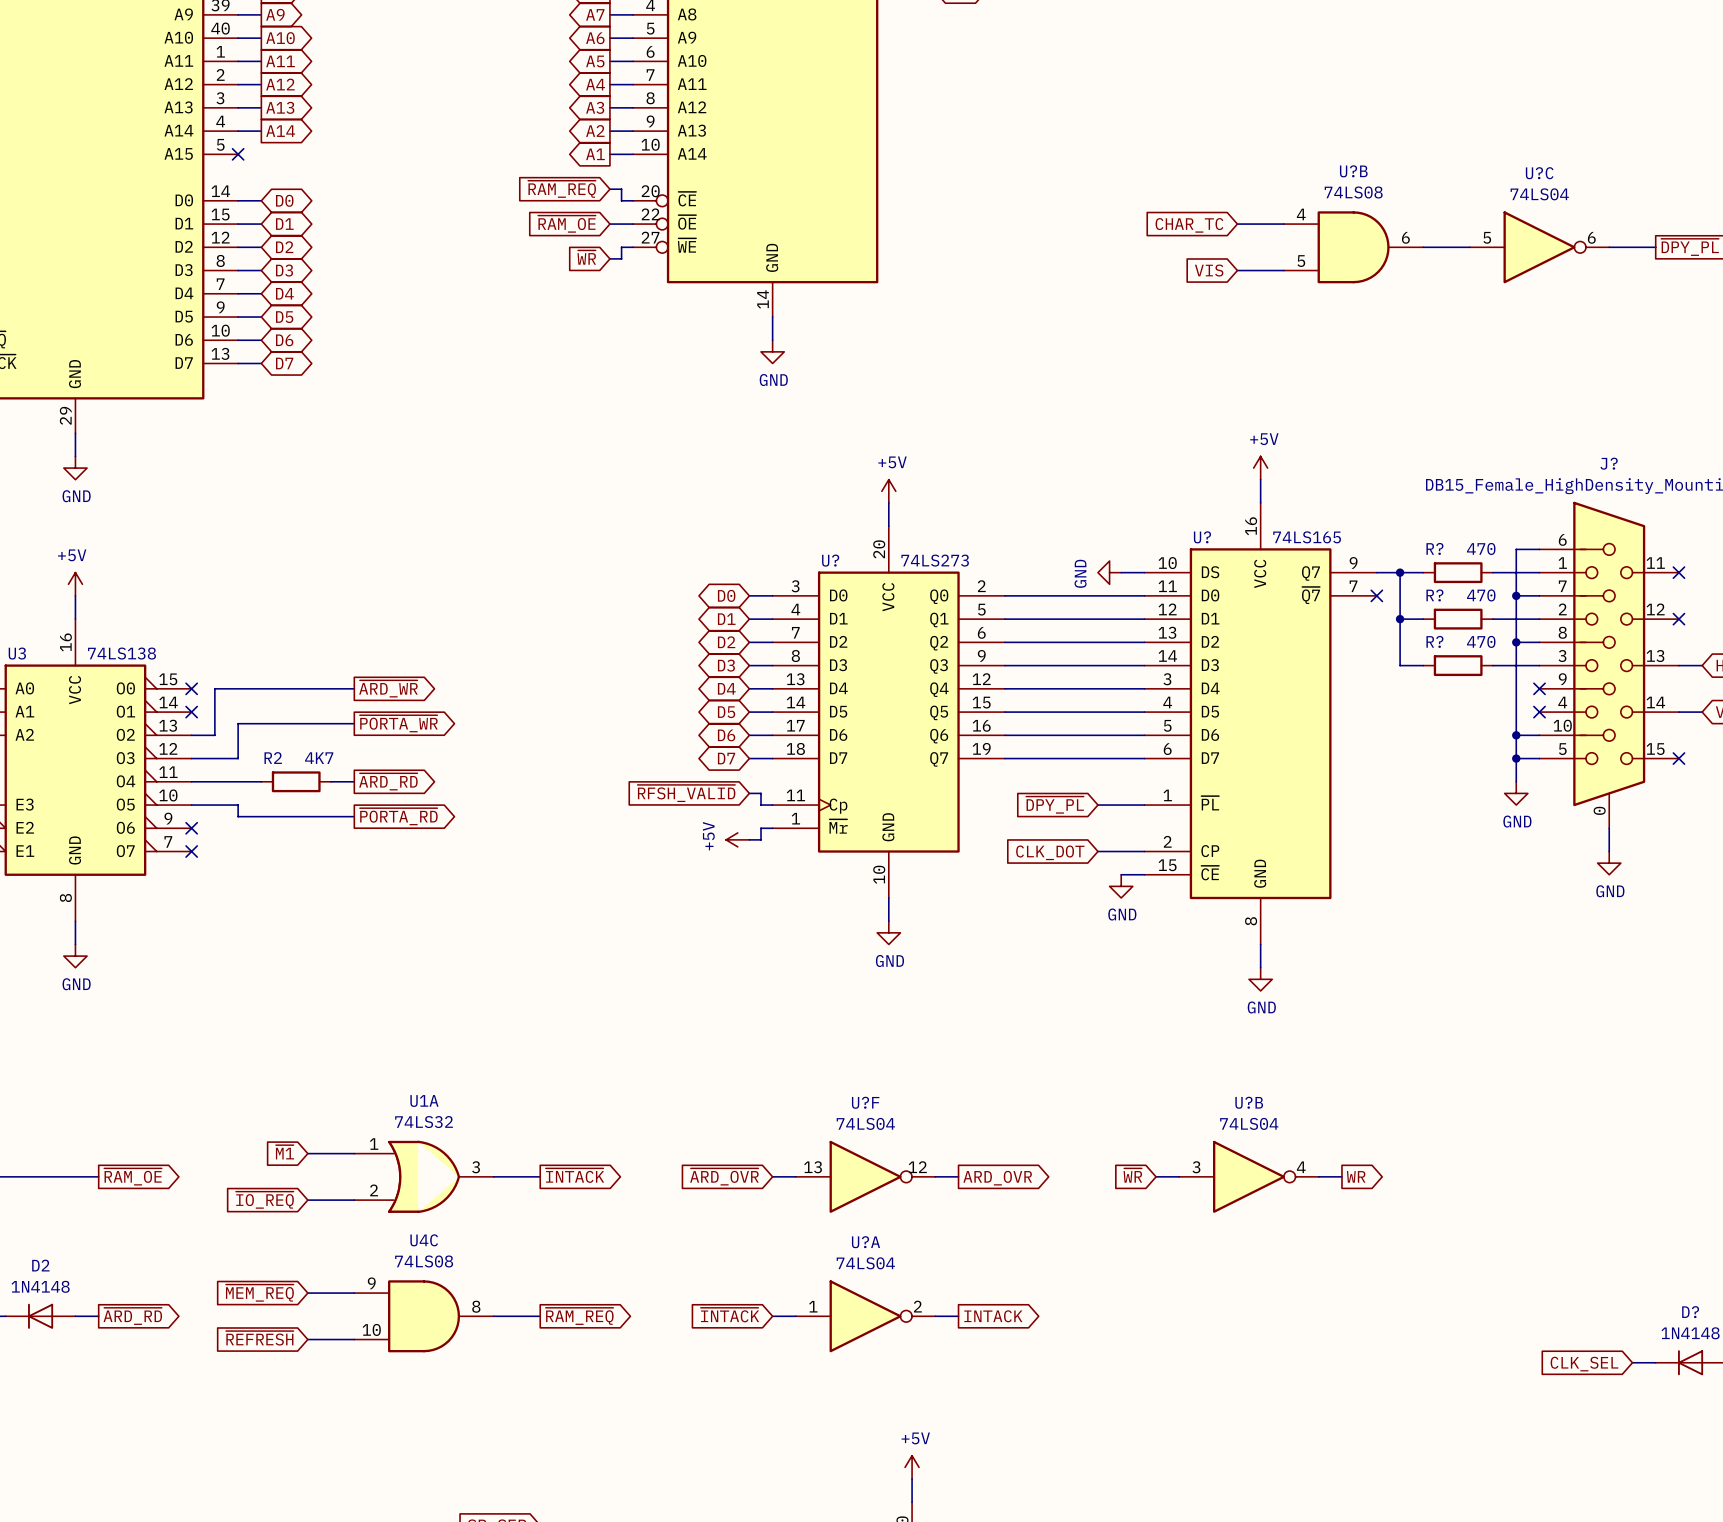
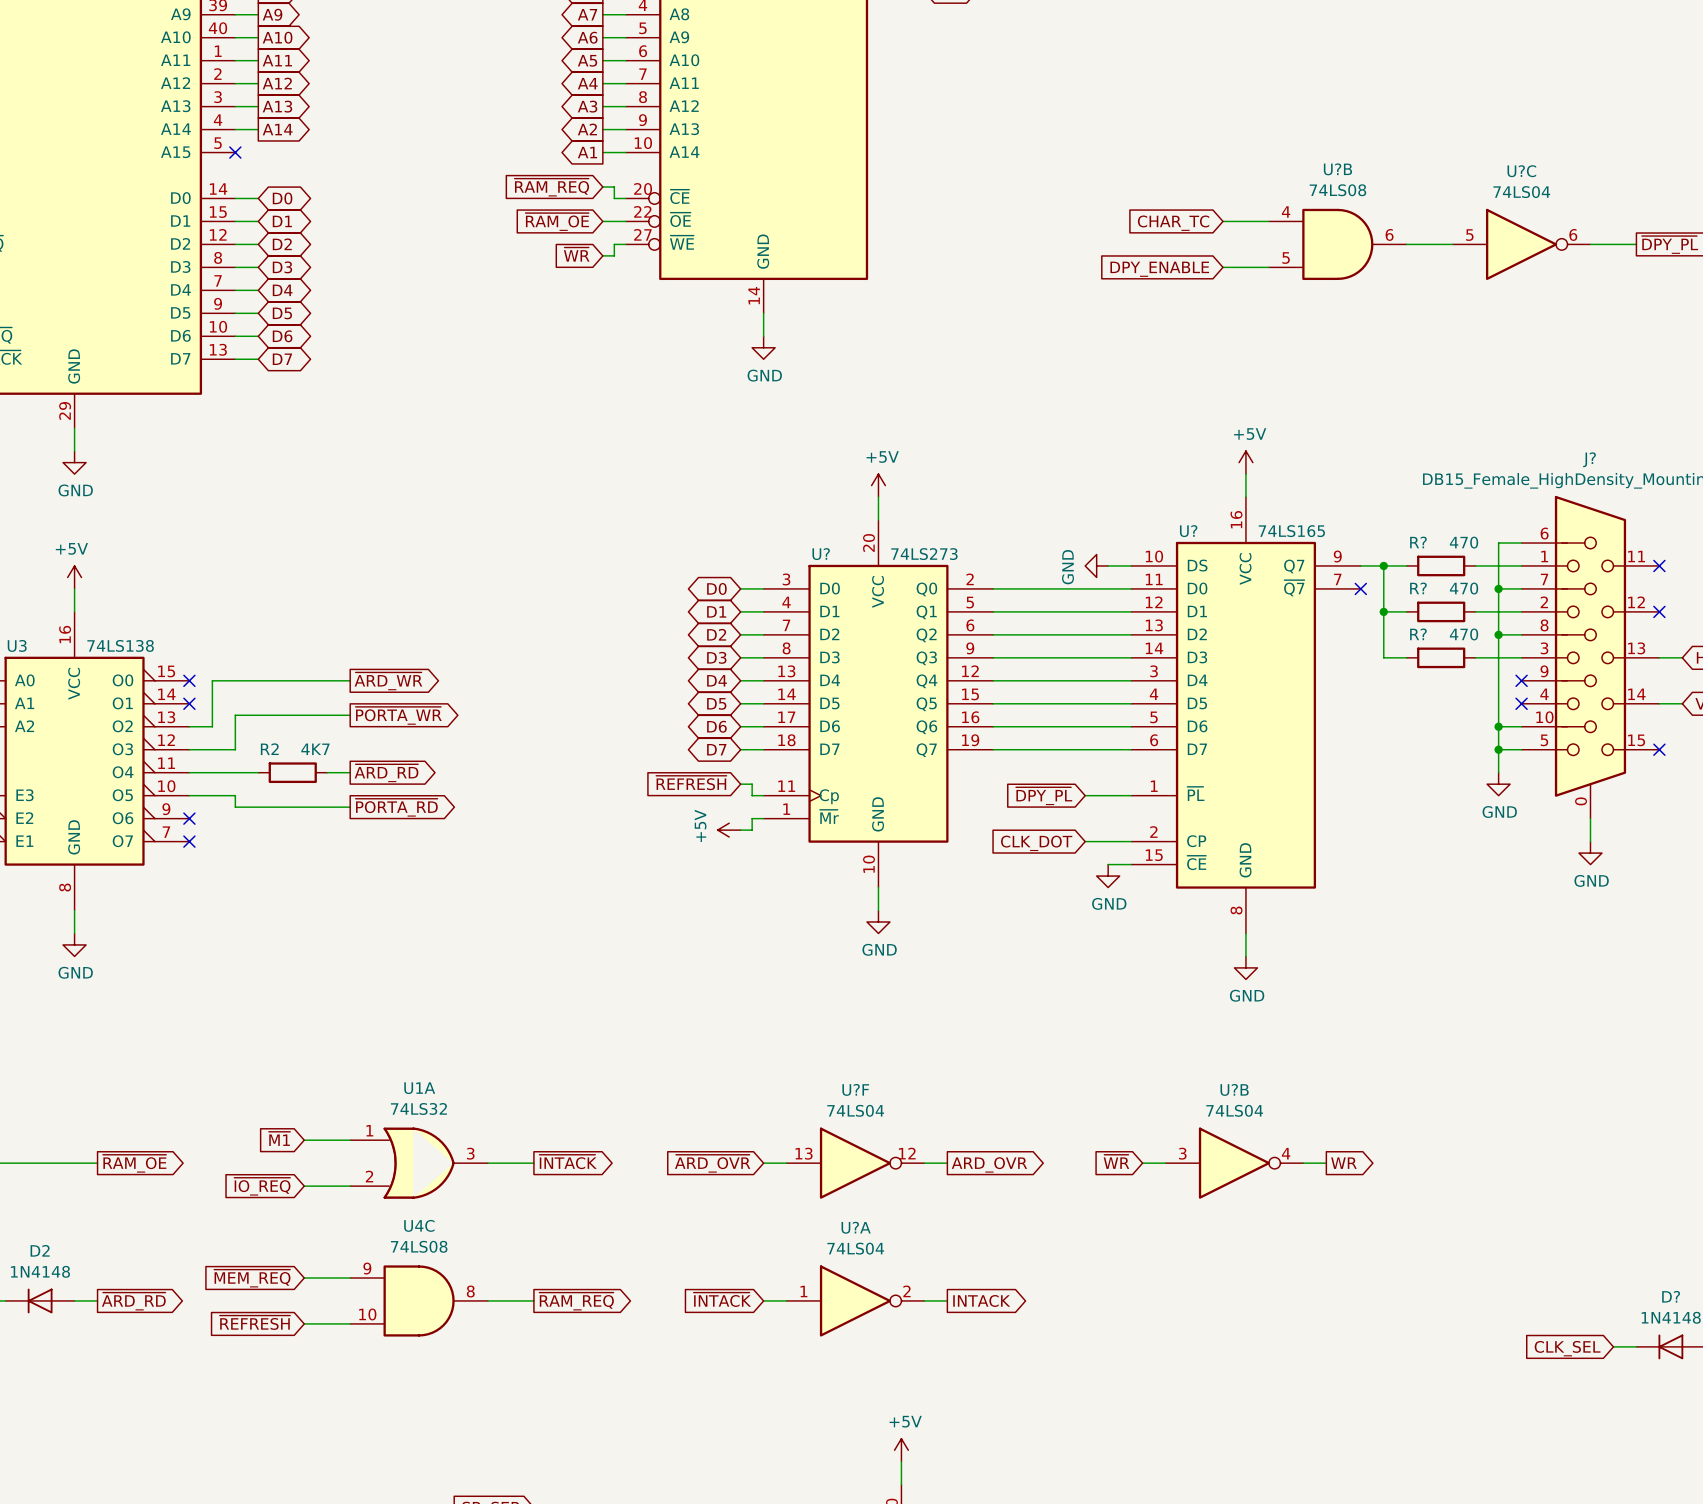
global label: VIS (1209, 270) -> DPY_ENABLE (1159, 269)
global label: ~{RFSH_VALID} (686, 793) -> ~{REFRESH} (691, 782)

